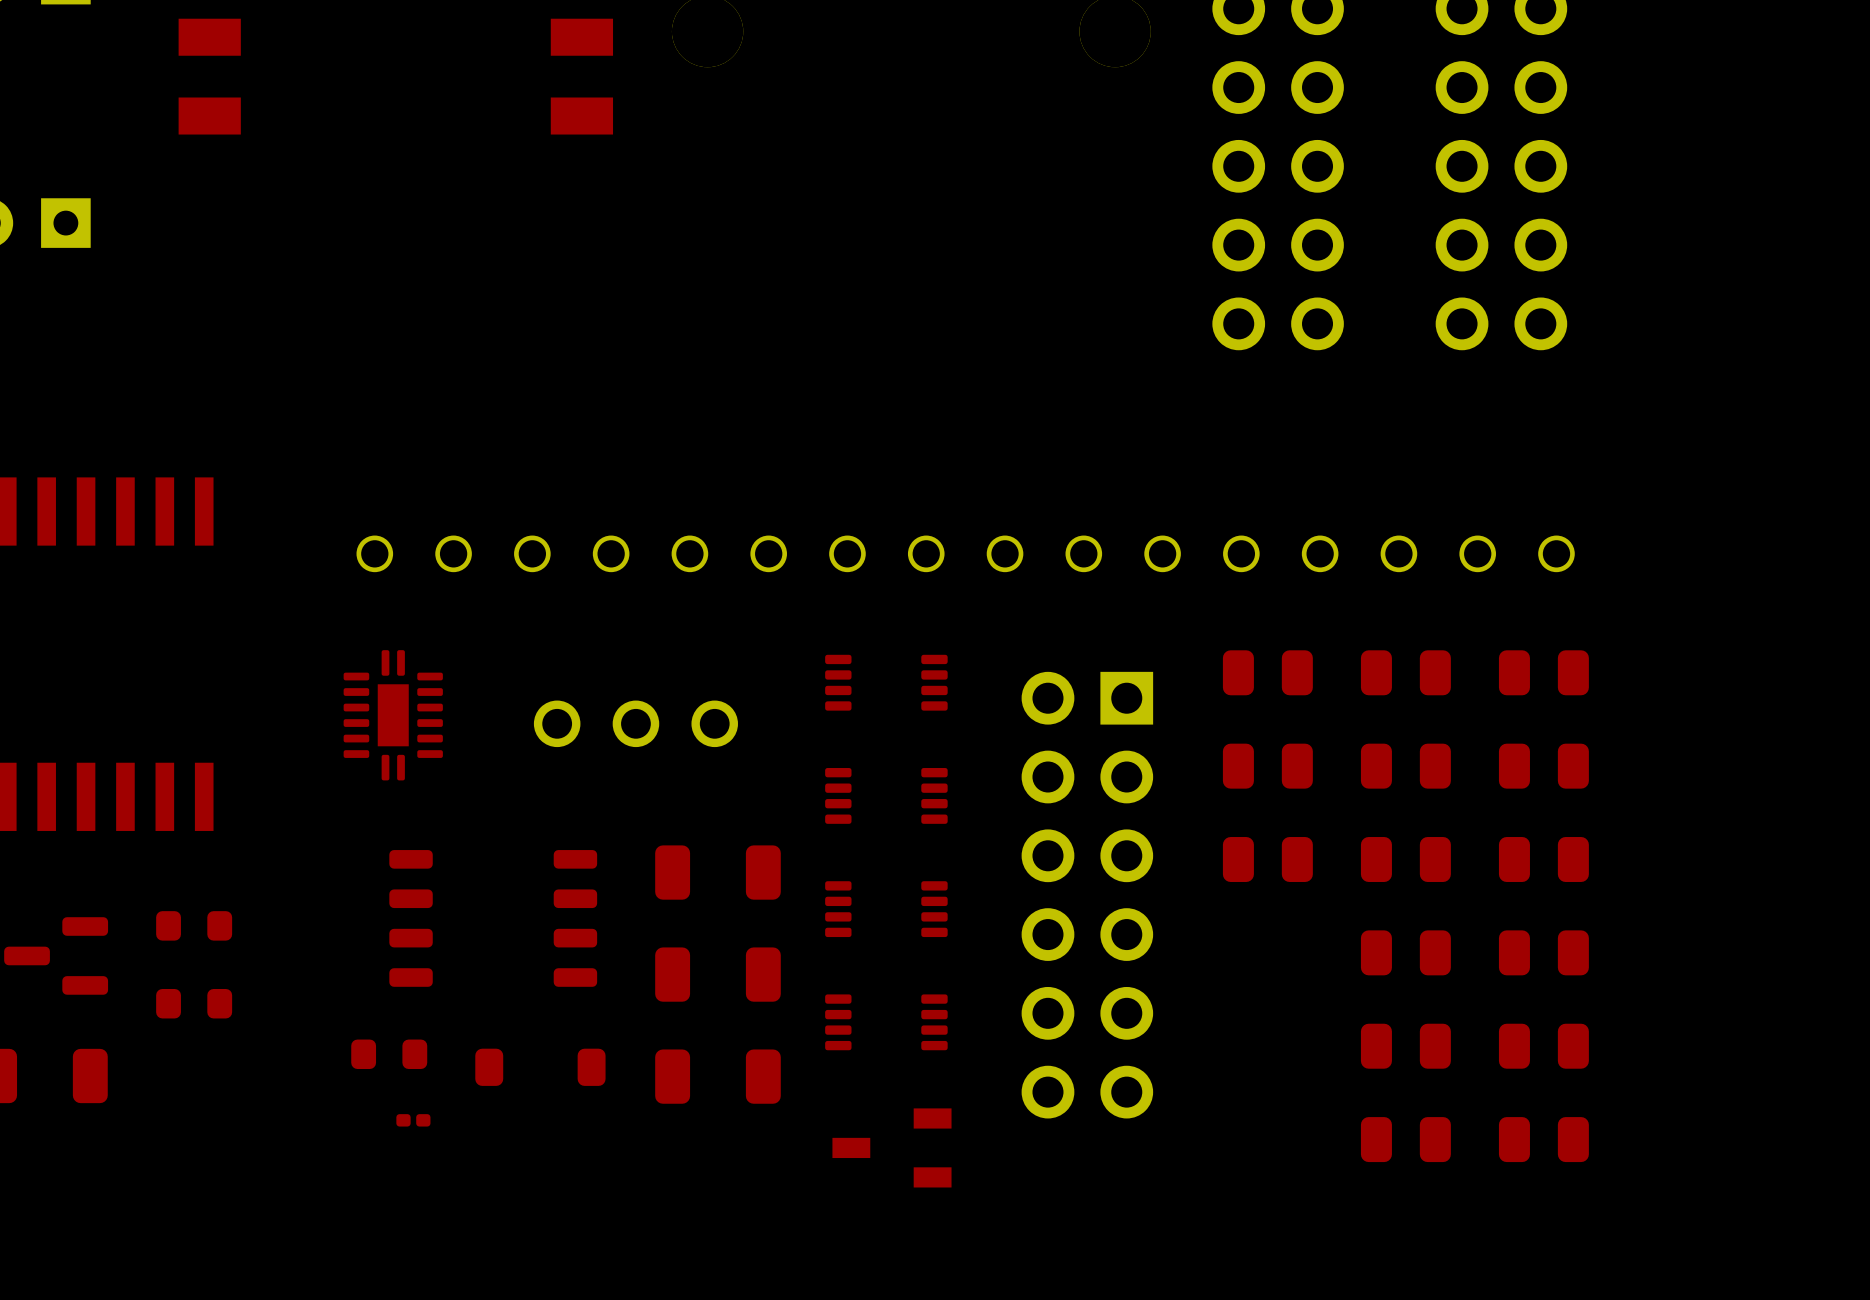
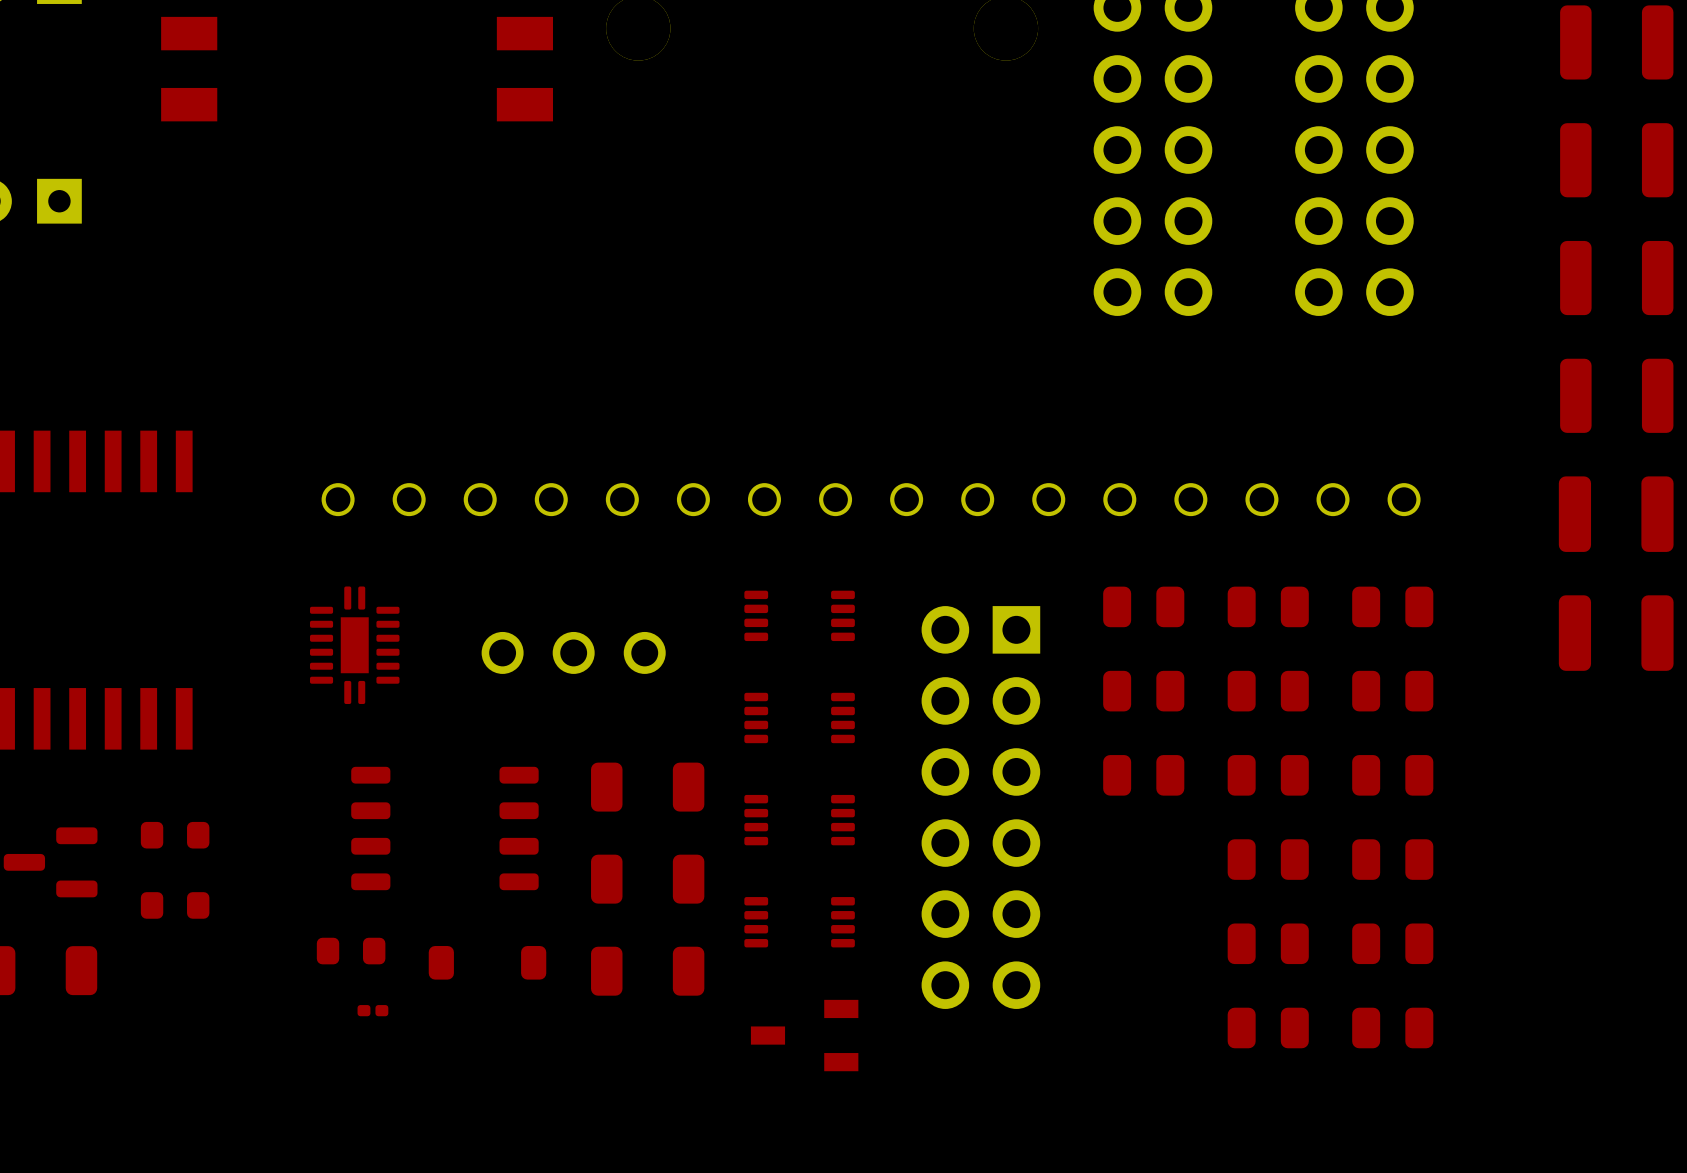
part: none -> (1616, 42)
part: none -> (1616, 160)
part: none -> (1616, 278)
part: none -> (1616, 395)
part: none -> (1616, 514)
part: none -> (1616, 633)

